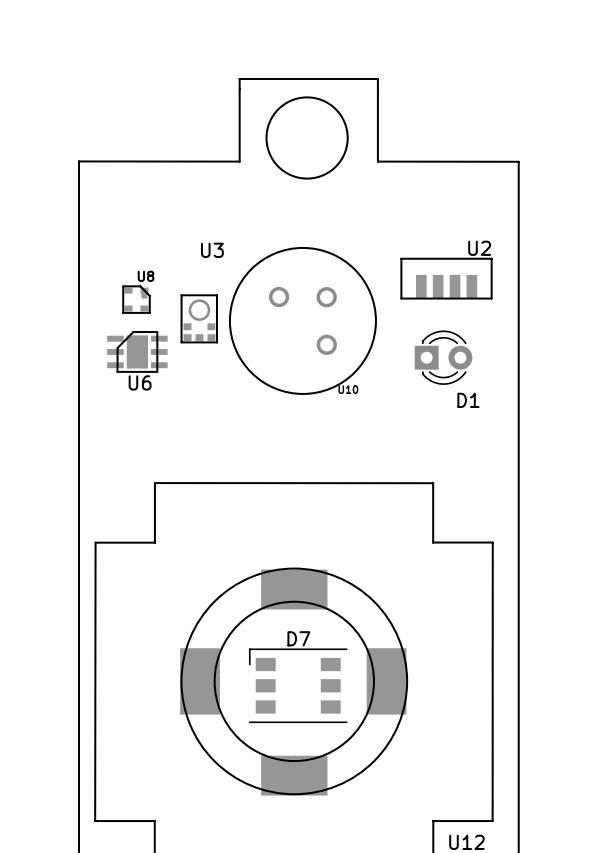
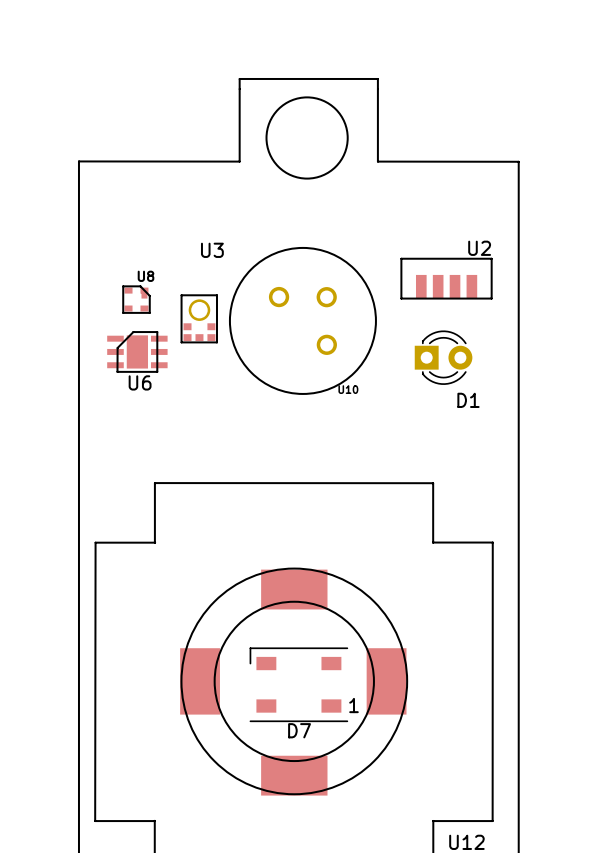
D7 name position: D7 (298, 638) -> D7 (299, 730)
D7 footprint: [248, 648, 348, 724] -> [249, 647, 349, 723]

